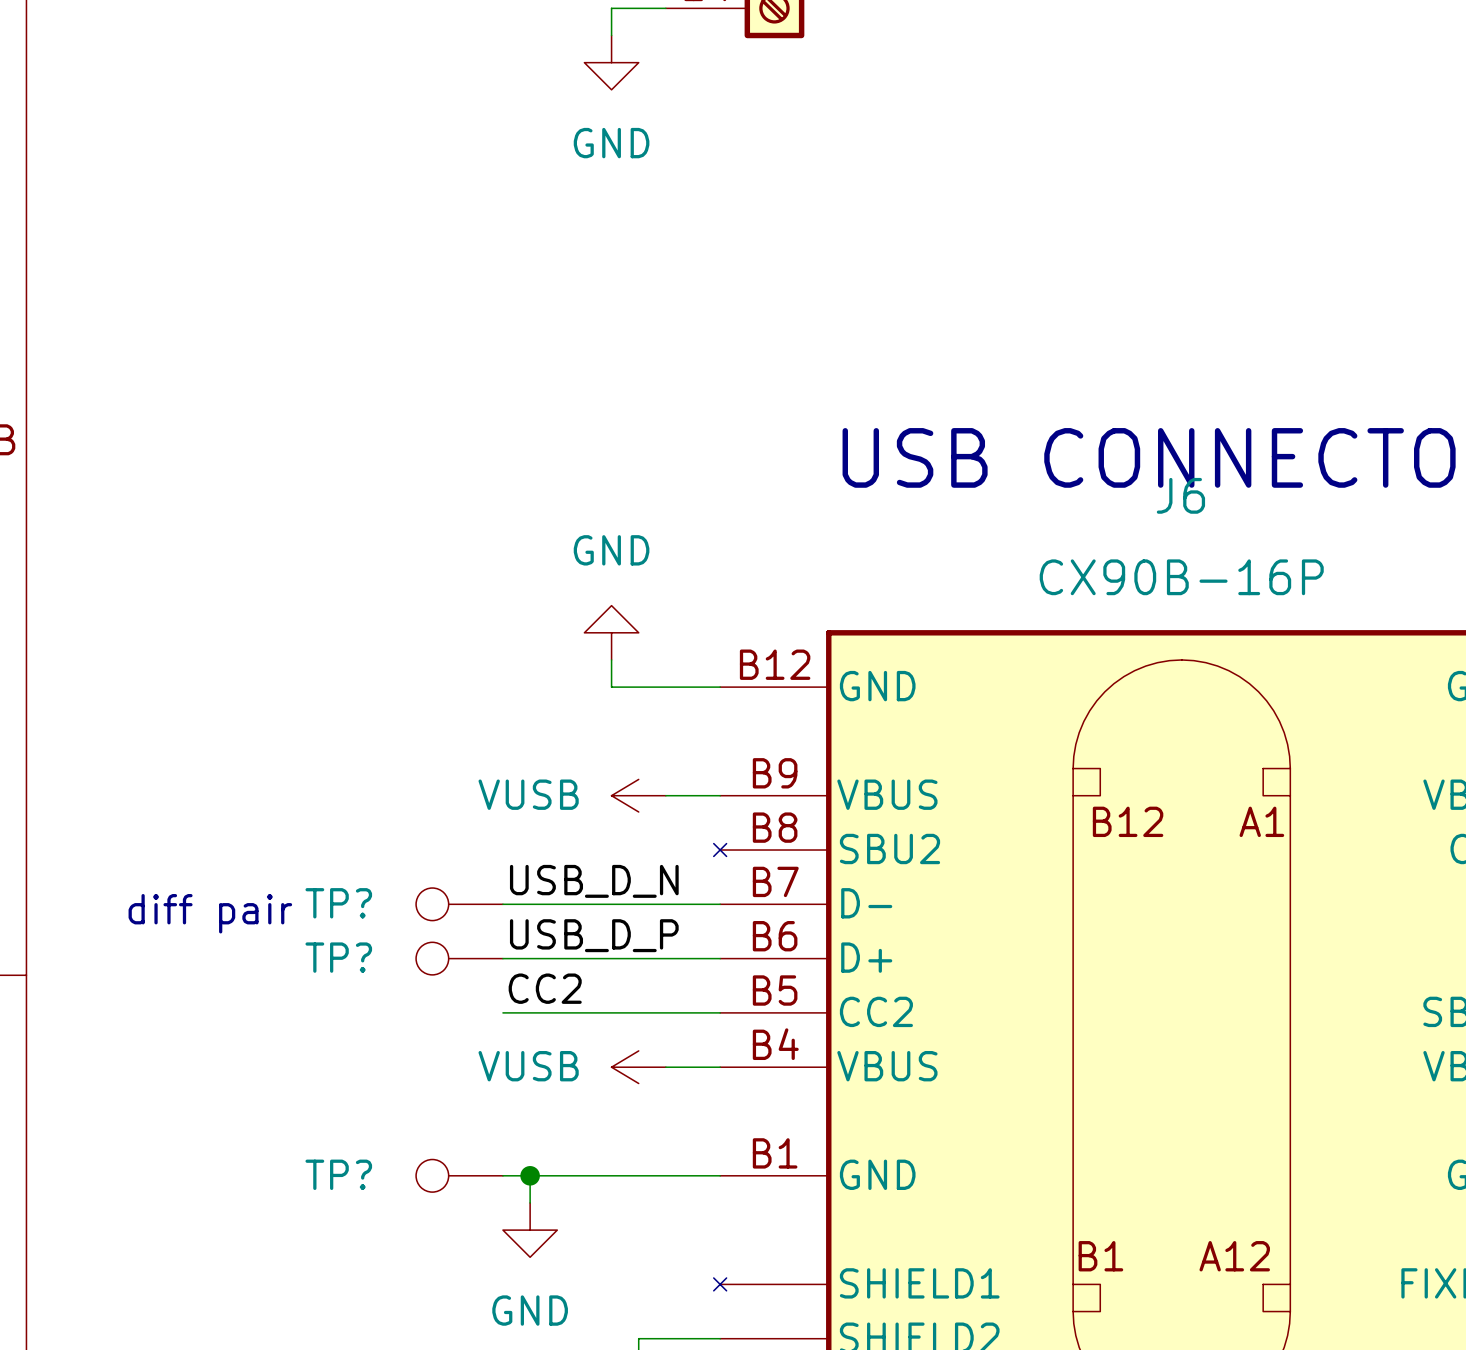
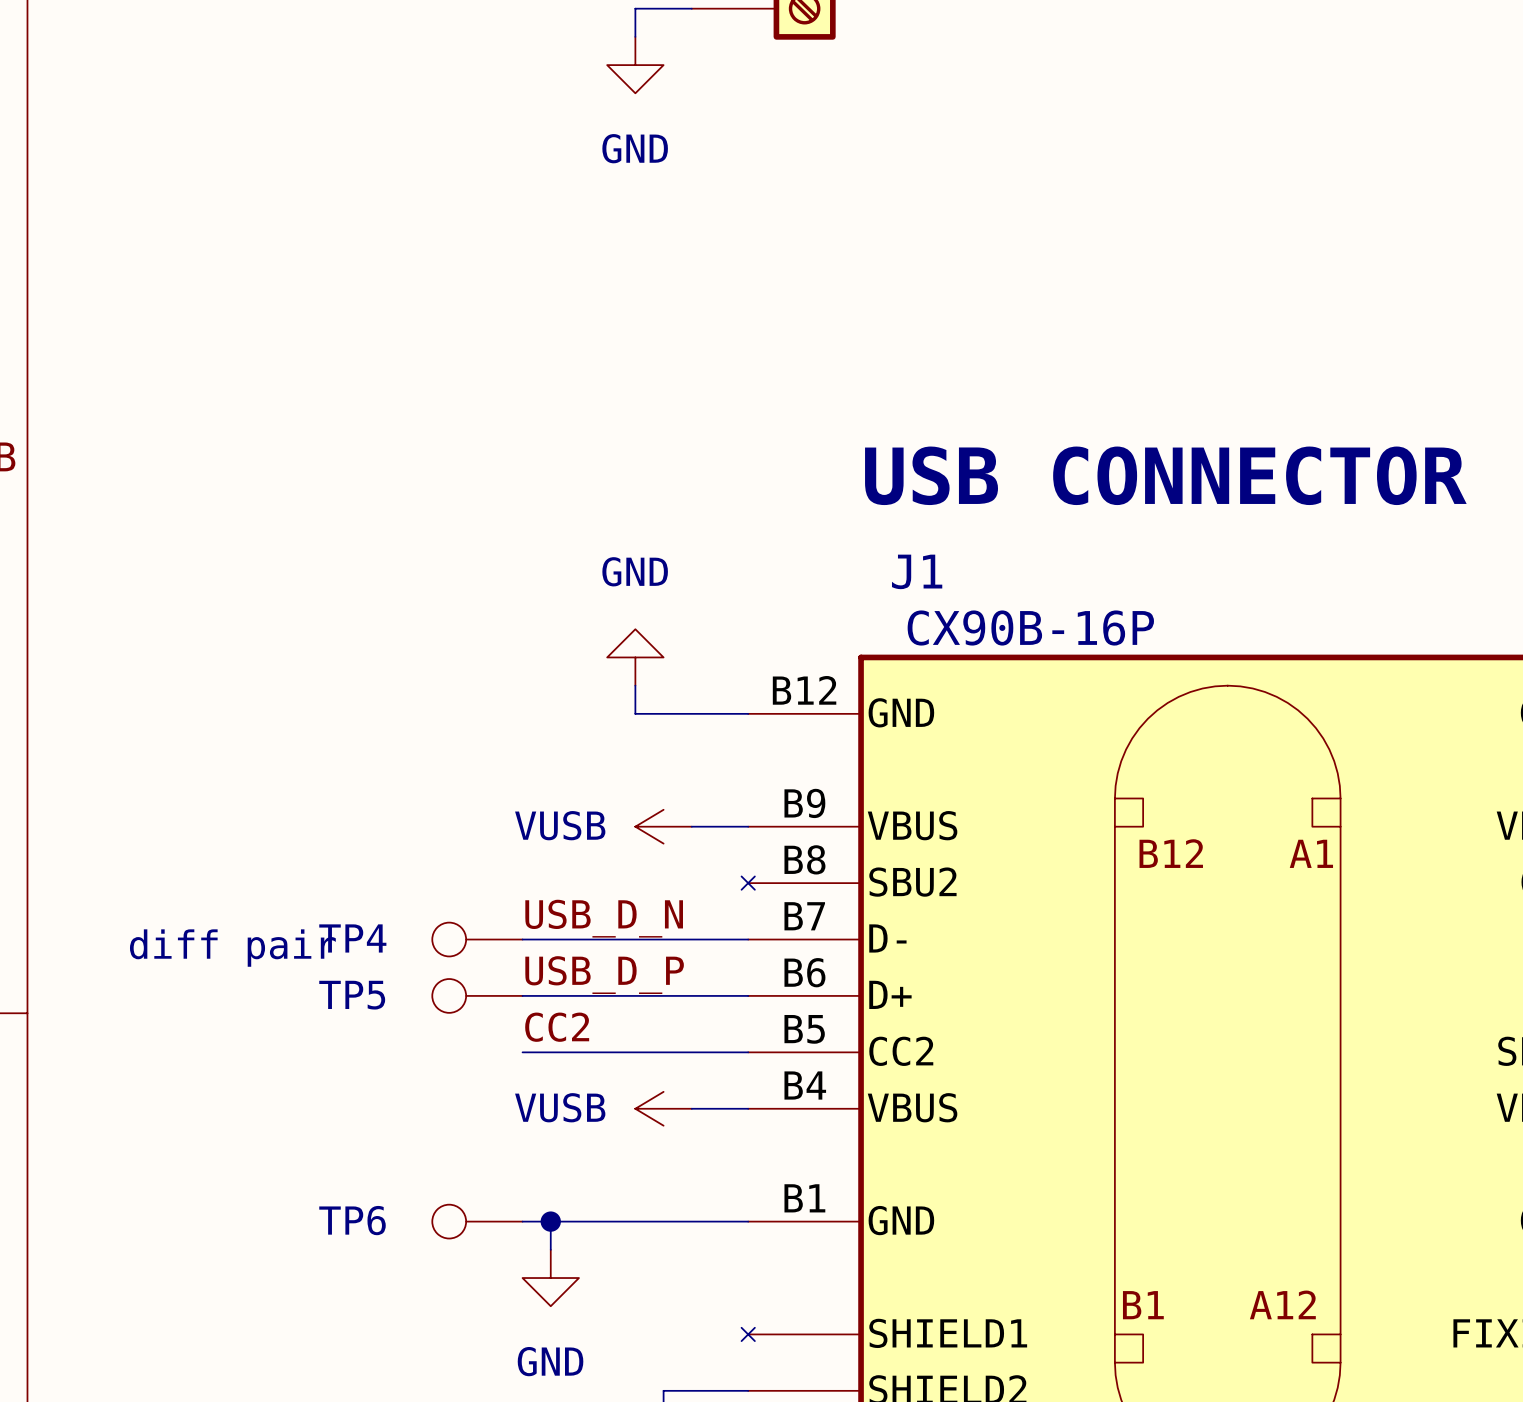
J6 name: J6 (1180, 495) -> J1 (917, 571)
J6 value position: CX90B-16P (1181, 577) -> CX90B-16P (1030, 628)
TP? name: TP? (338, 903) -> TP4 (352, 938)
TP? name: TP? (338, 957) -> TP5 (352, 995)
TP? name: TP? (338, 1174) -> TP6 (352, 1220)

